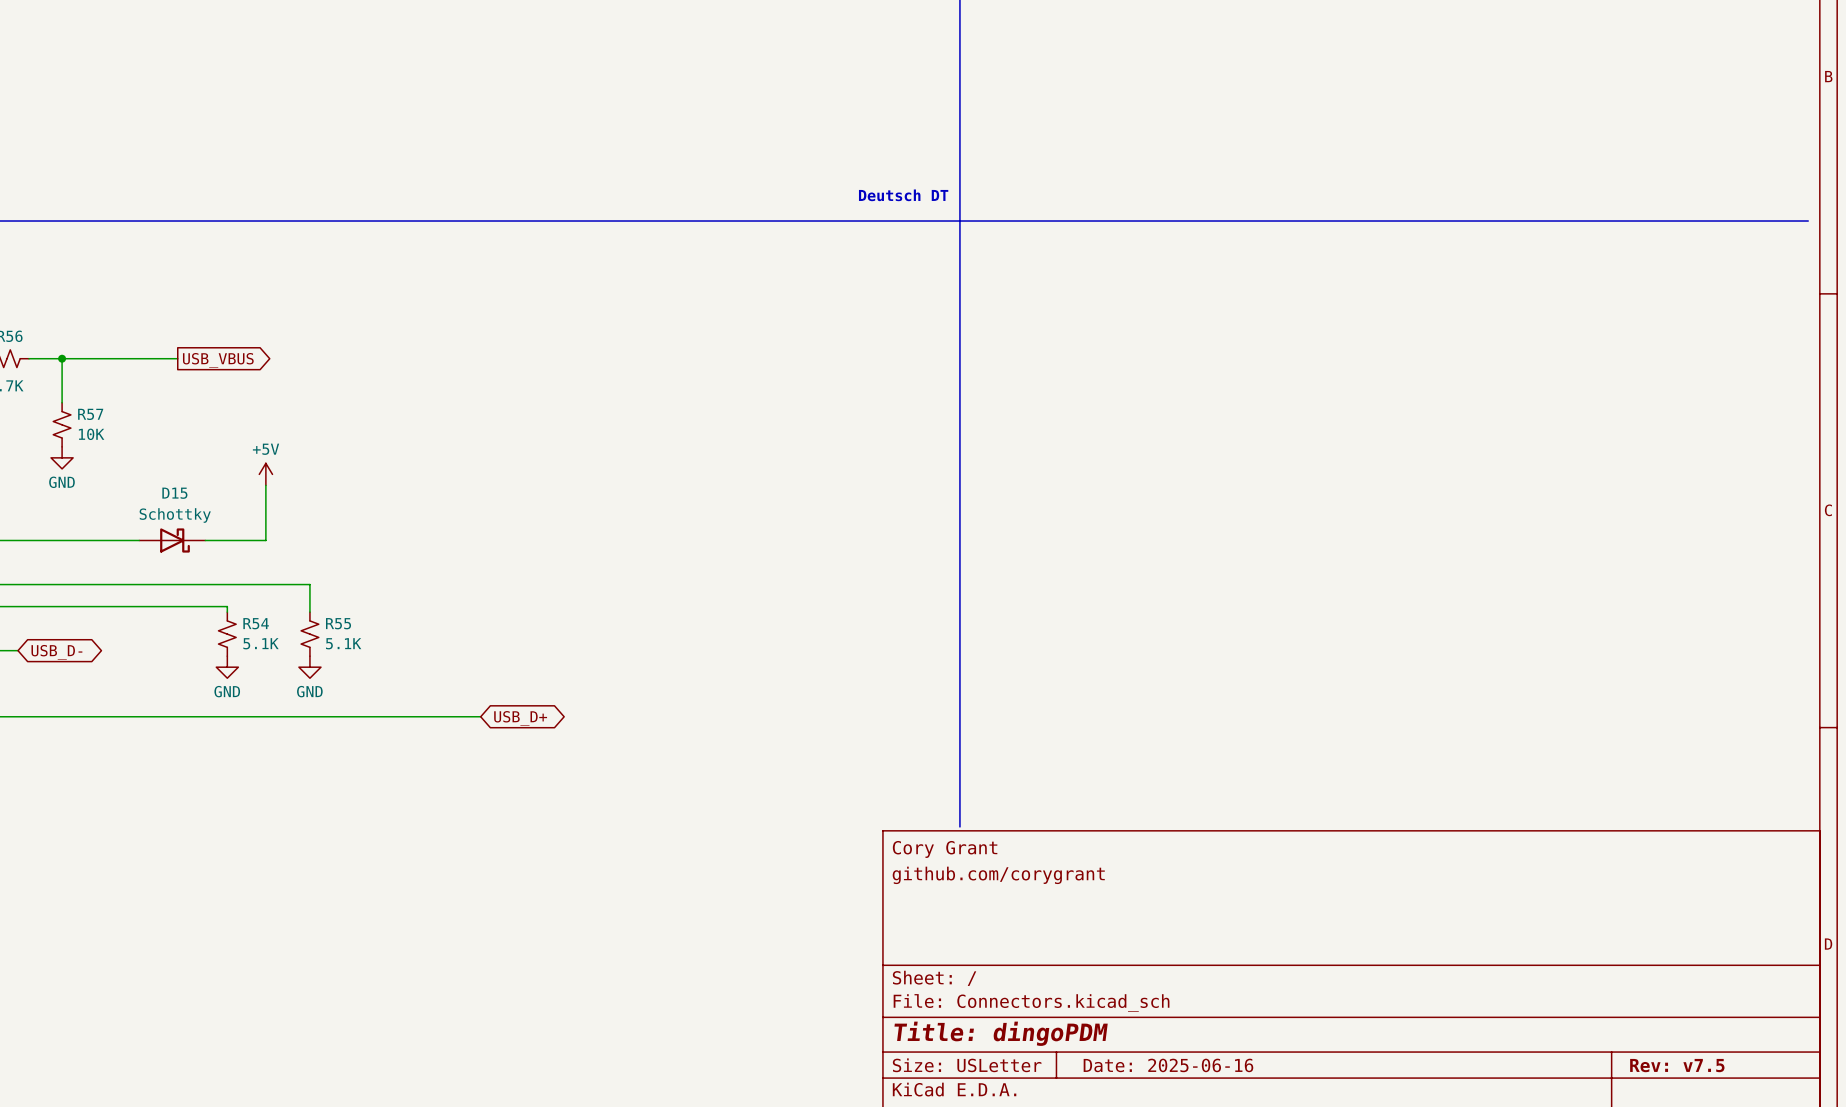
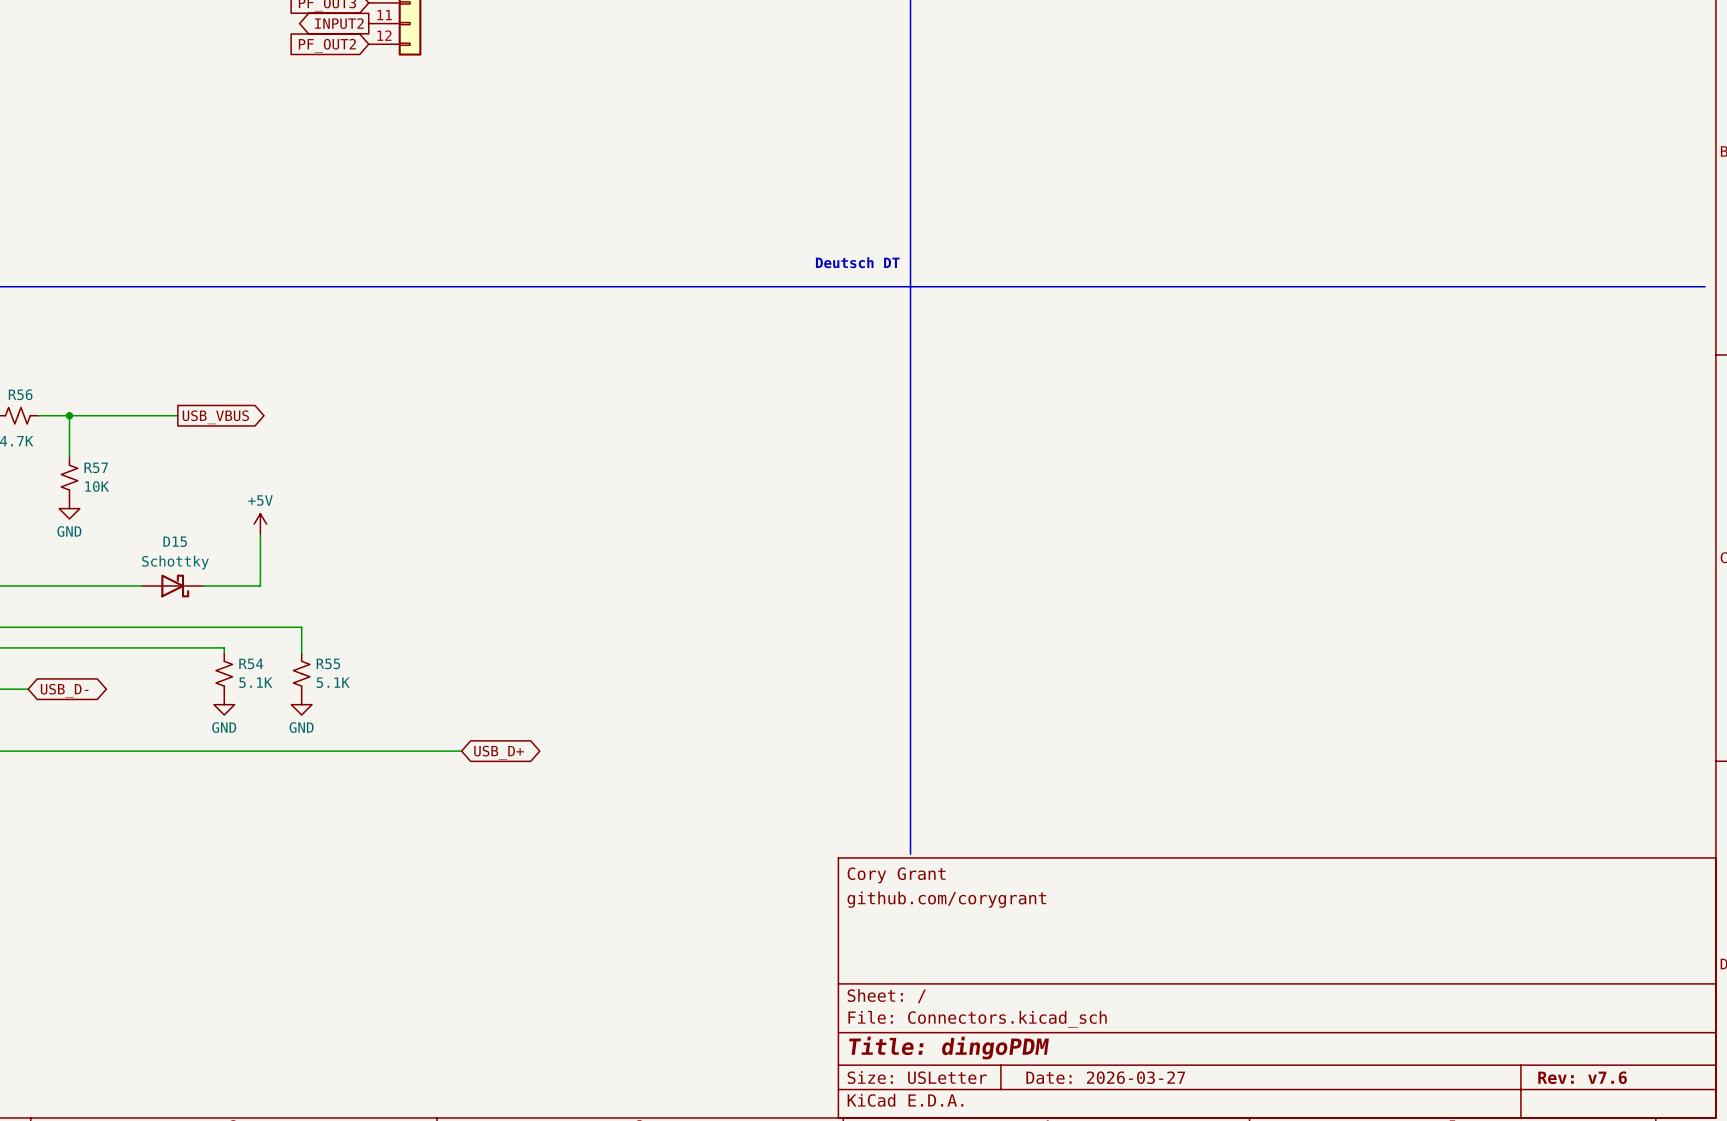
title block: Date: 2025-06-16 (1168, 1065) -> Date: 2026-03-27 (1105, 1077)
title block: Rev: v7.5 (1677, 1065) -> Rev: v7.6 (1582, 1077)

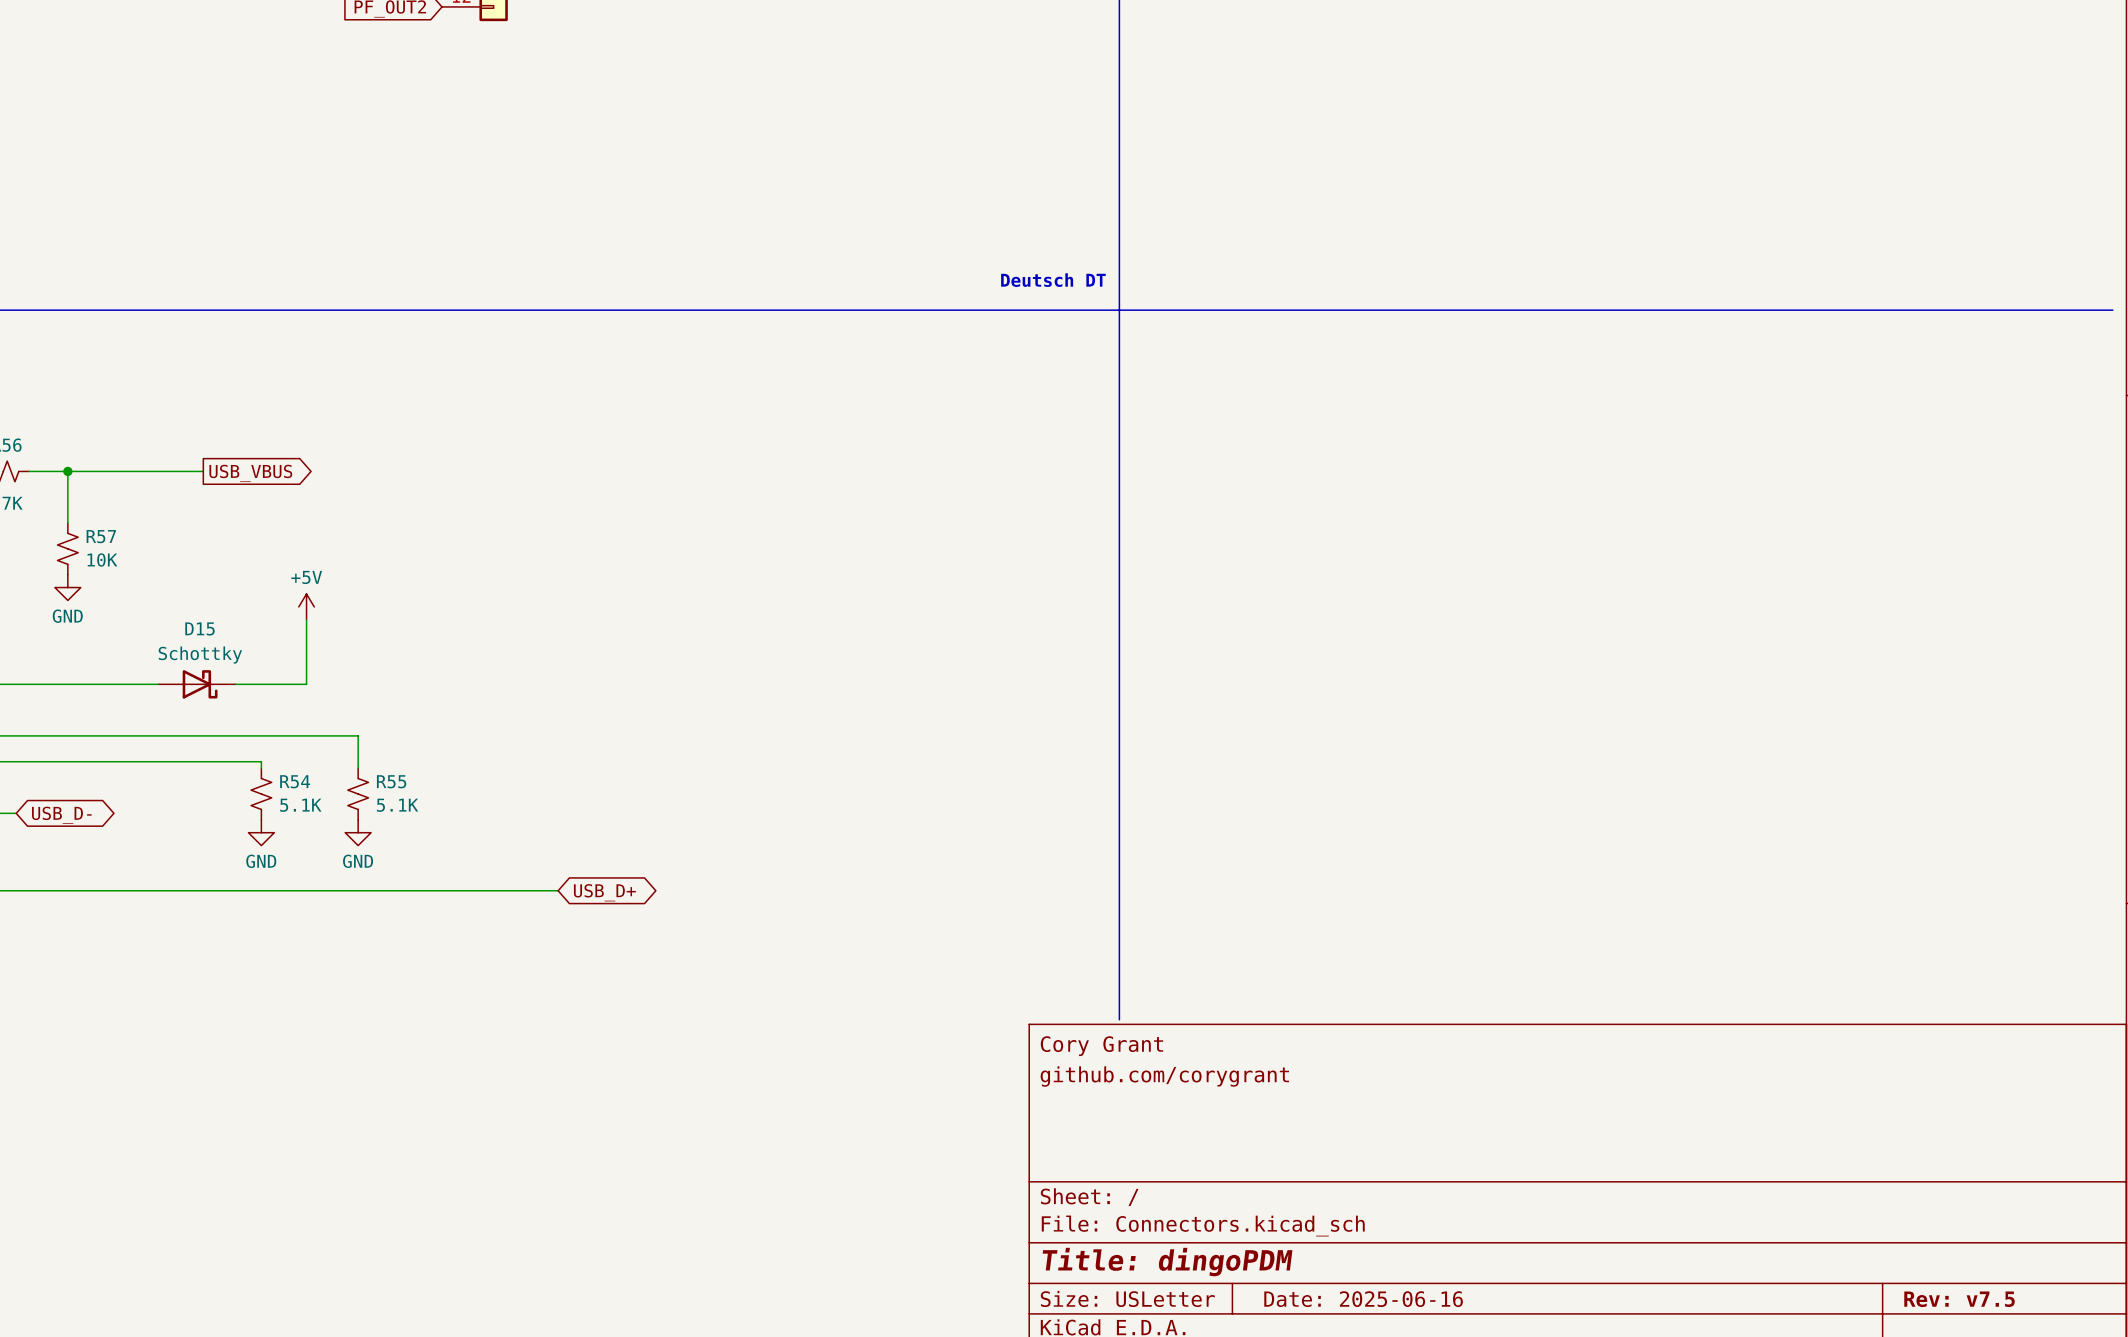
title block: Date: 2026-03-27 (1105, 1077) -> Date: 2025-06-16 (1363, 1299)
title block: Rev: v7.6 (1582, 1077) -> Rev: v7.5 (1959, 1299)

